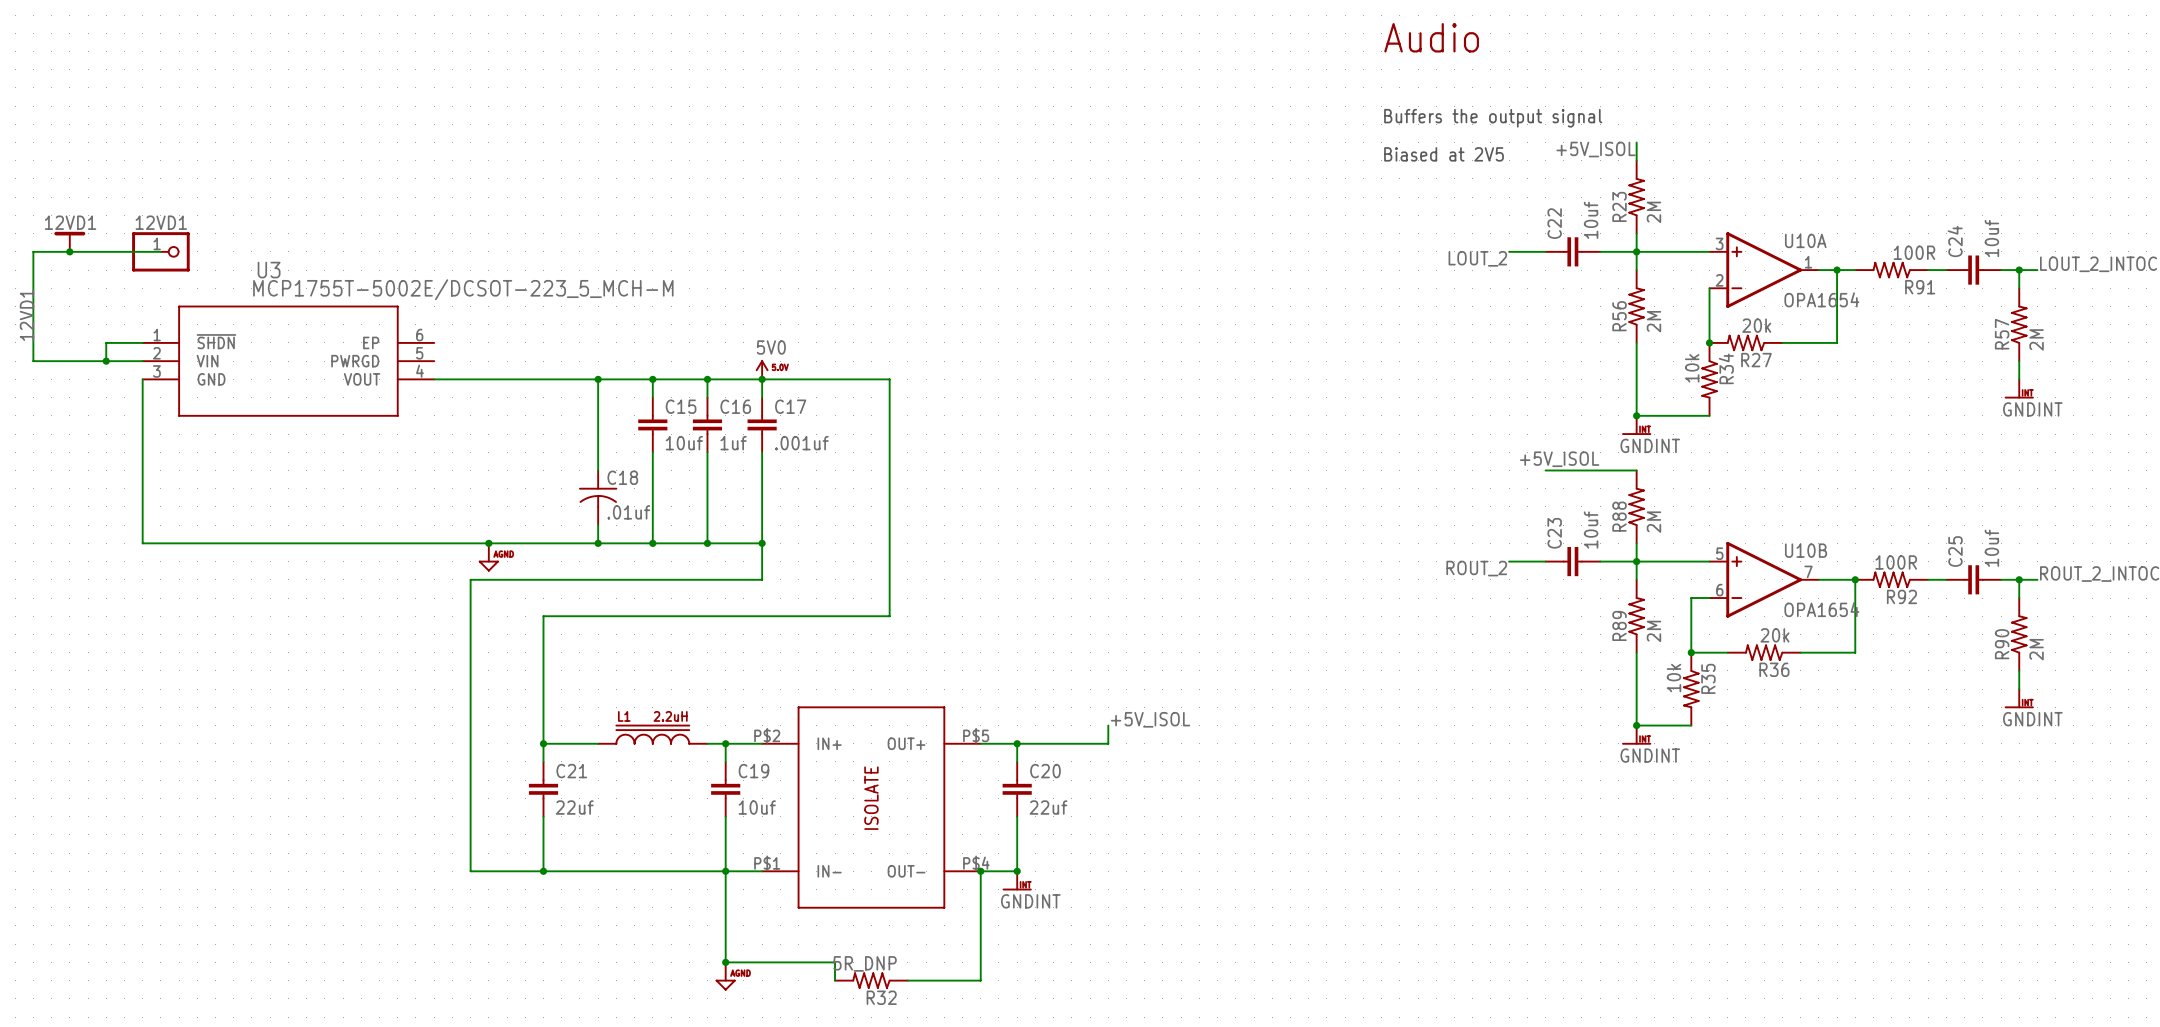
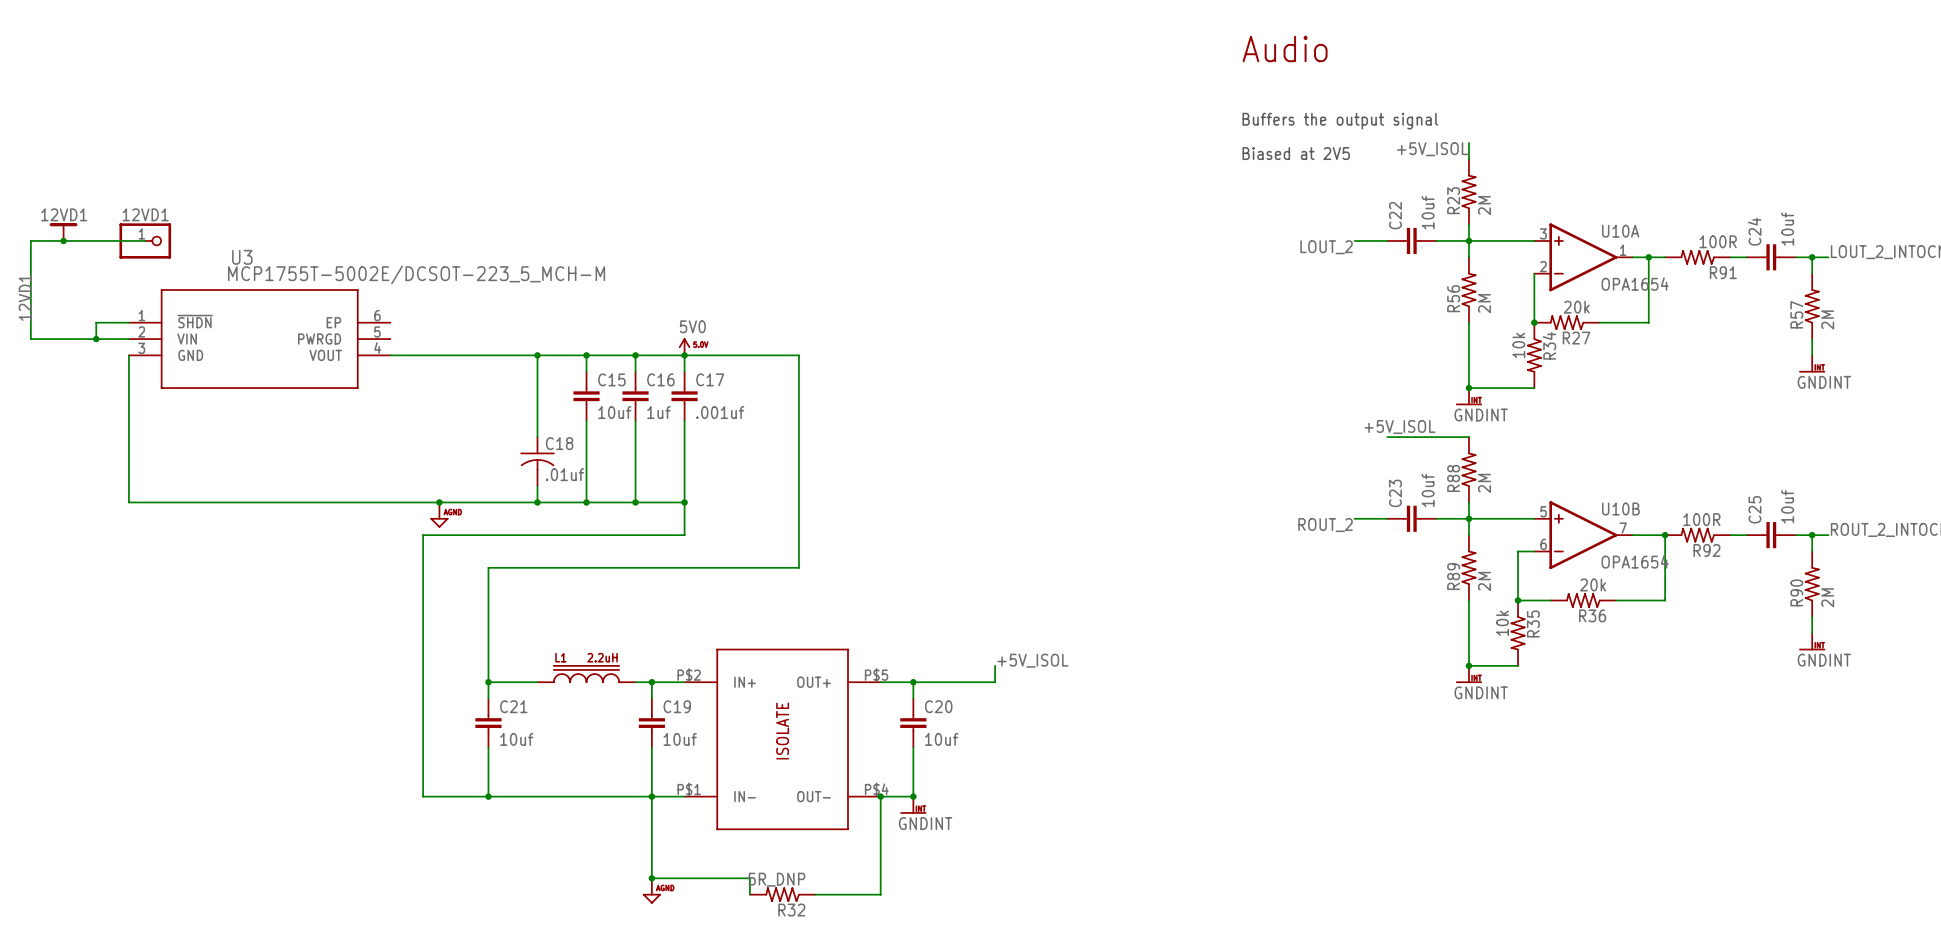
C21 value: 22uf (574, 807) -> 10uf (516, 739)
C20 value: 22uf (1048, 807) -> 10uf (941, 739)

